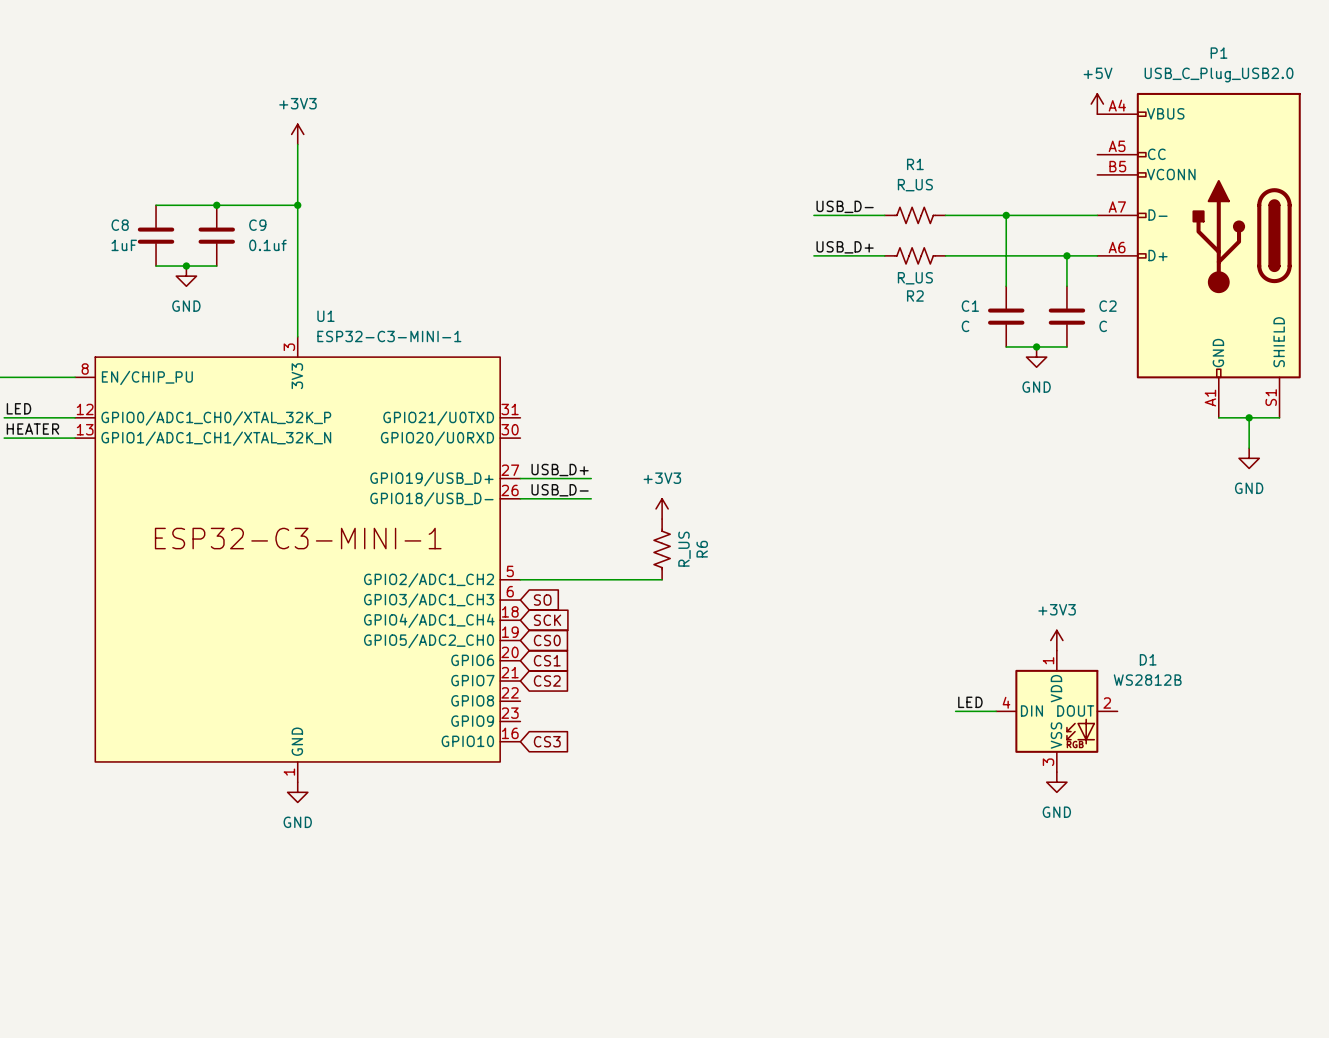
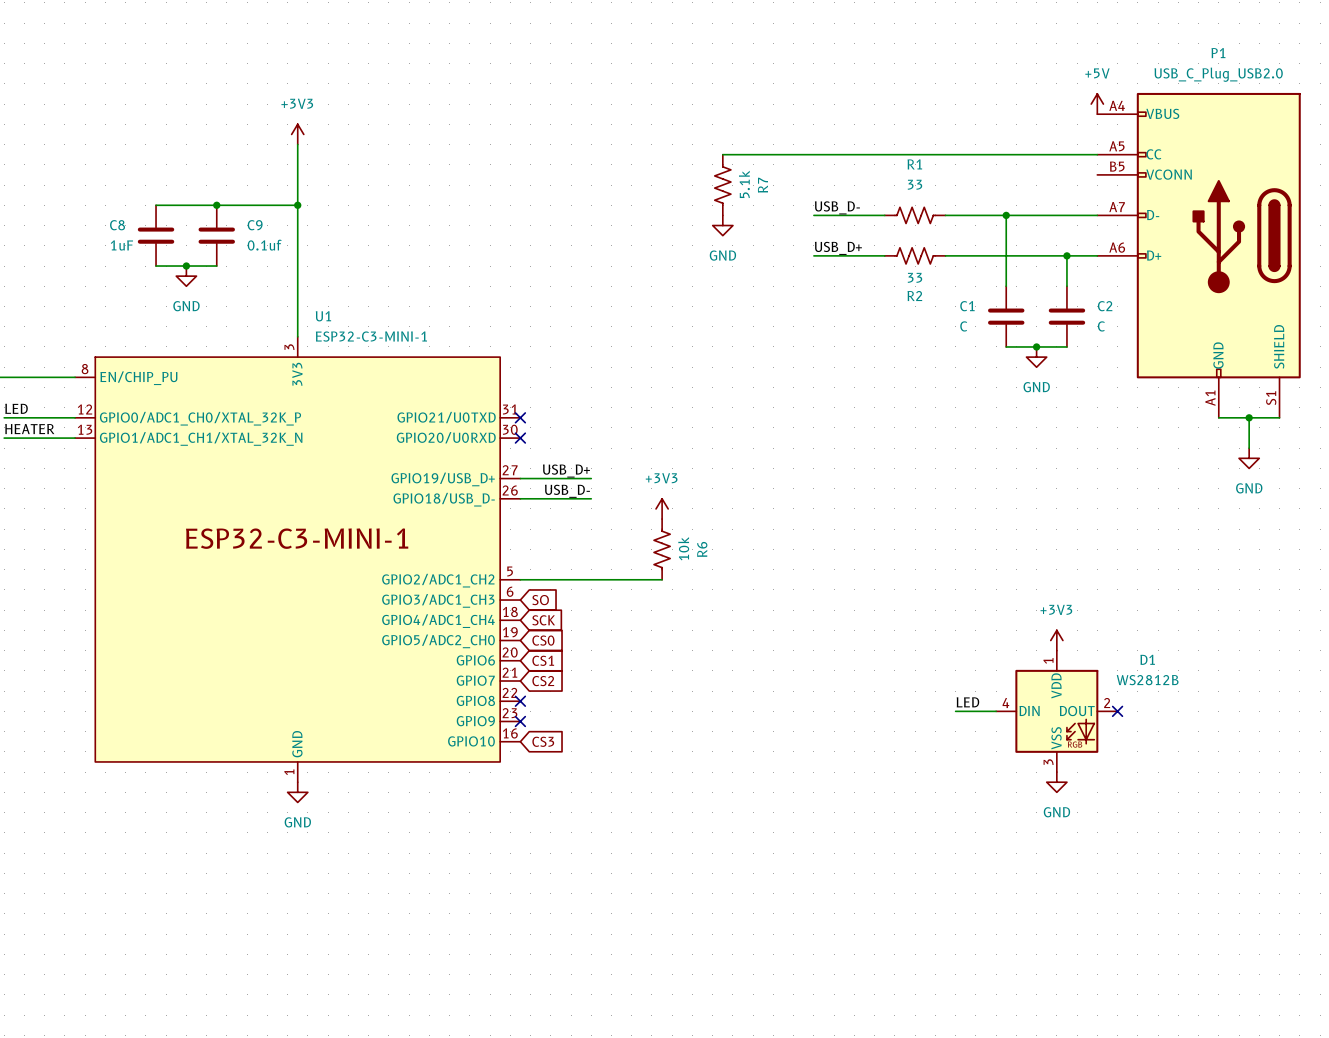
wire: none -> (722, 154) (1097, 154)
R7: none -> 5.1k (722, 185)
R1 value: R_US (915, 185) -> 33 (915, 184)
power symbol: none -> GND (722, 225)
R2 value: R_US (915, 278) -> 33 (915, 277)
no-connect mark: none -> (520, 417)
no-connect mark: none -> (520, 438)
R6 value: R_US (684, 549) -> 10k (683, 548)
no-connect mark: none -> (520, 701)
no-connect mark: none -> (1117, 711)
no-connect mark: none -> (520, 721)

